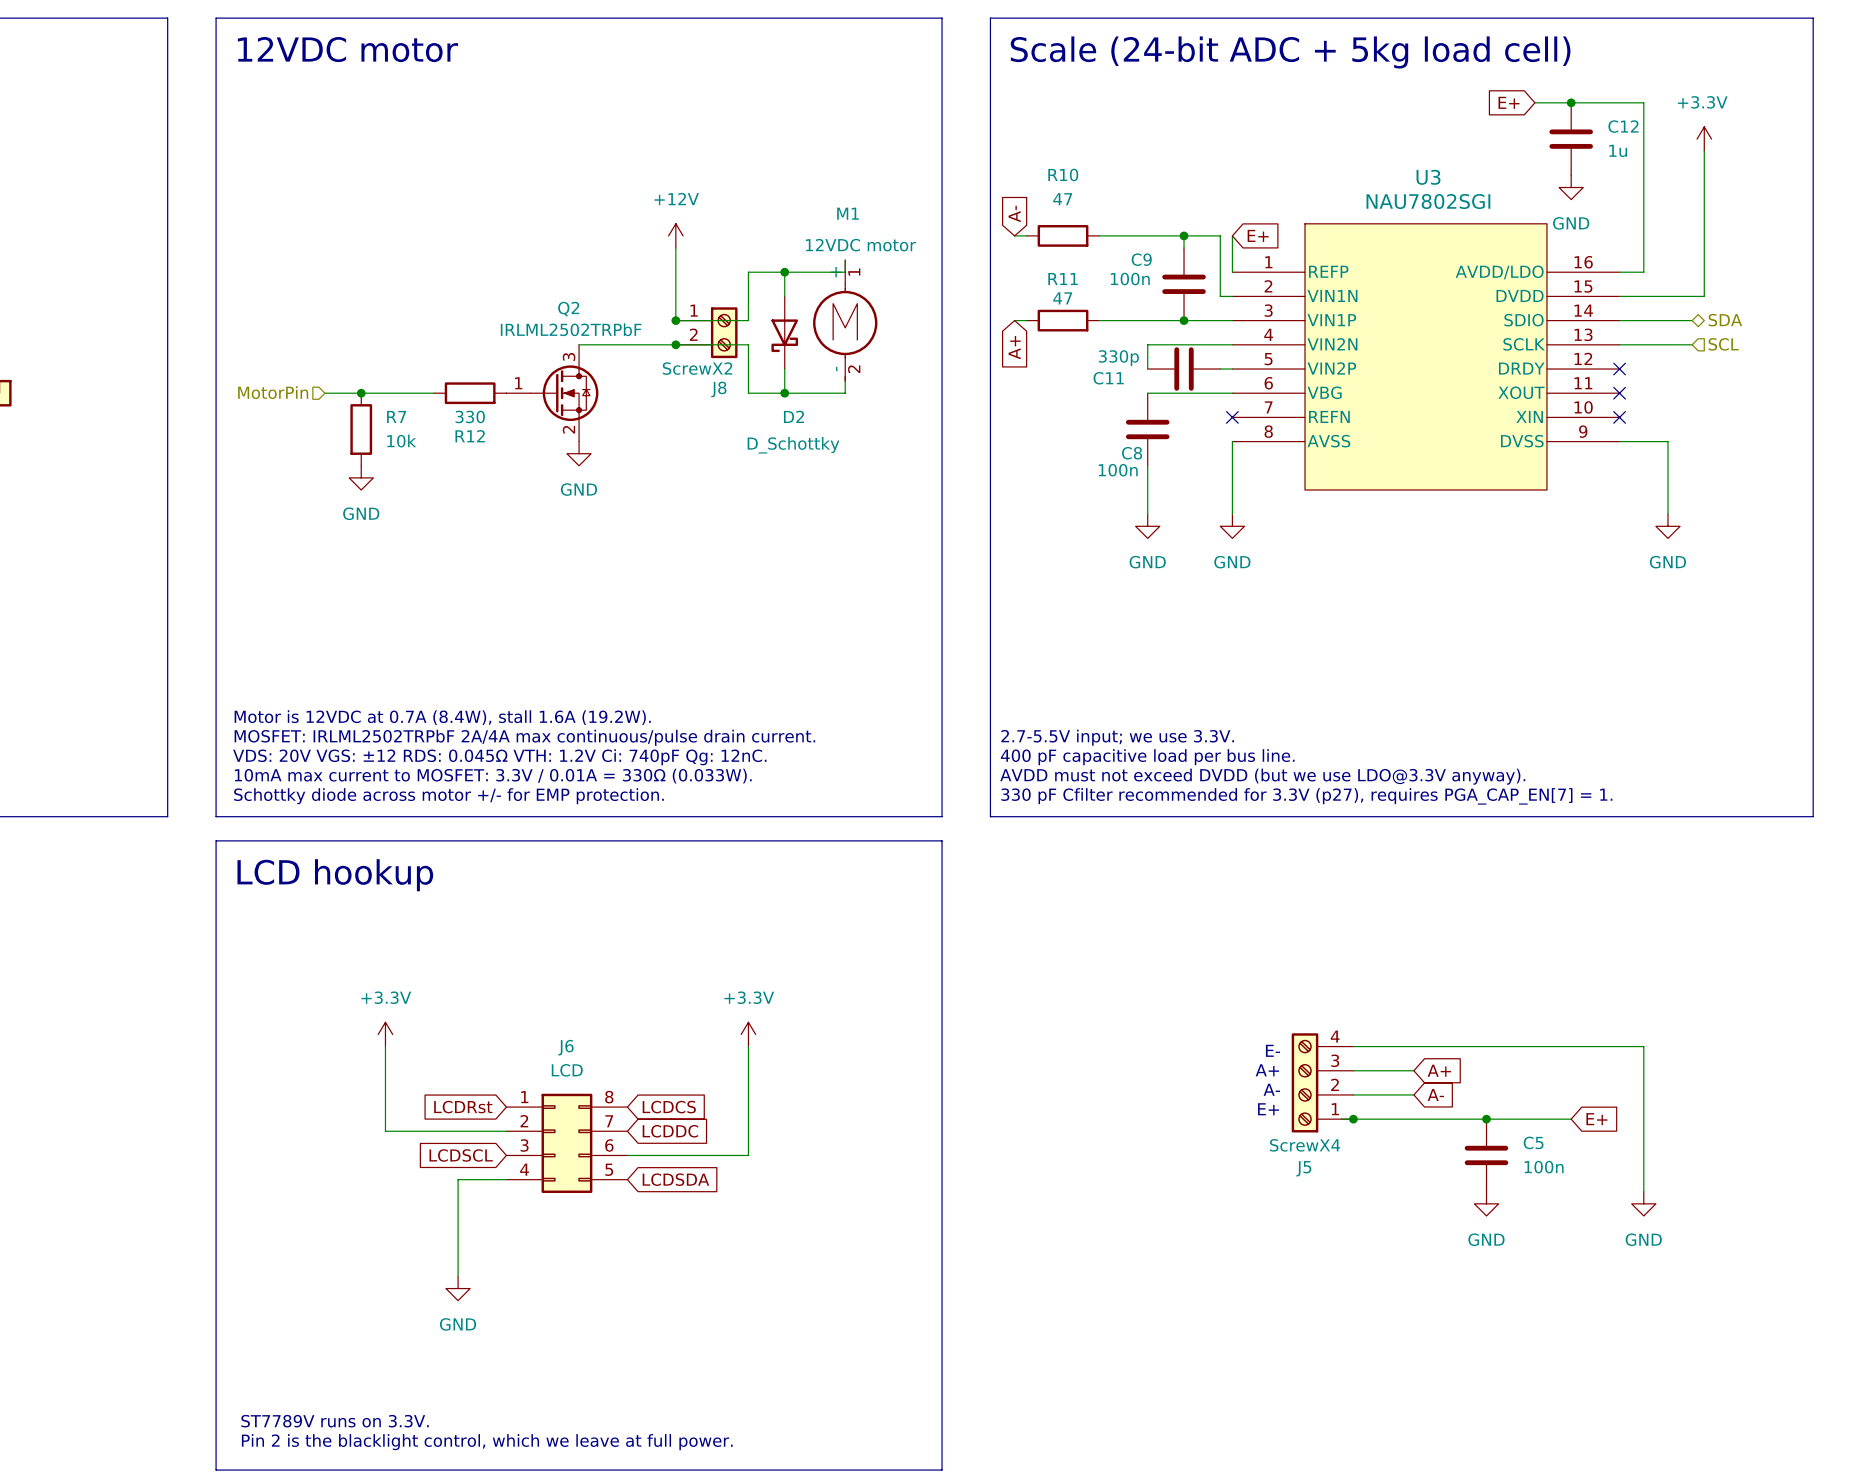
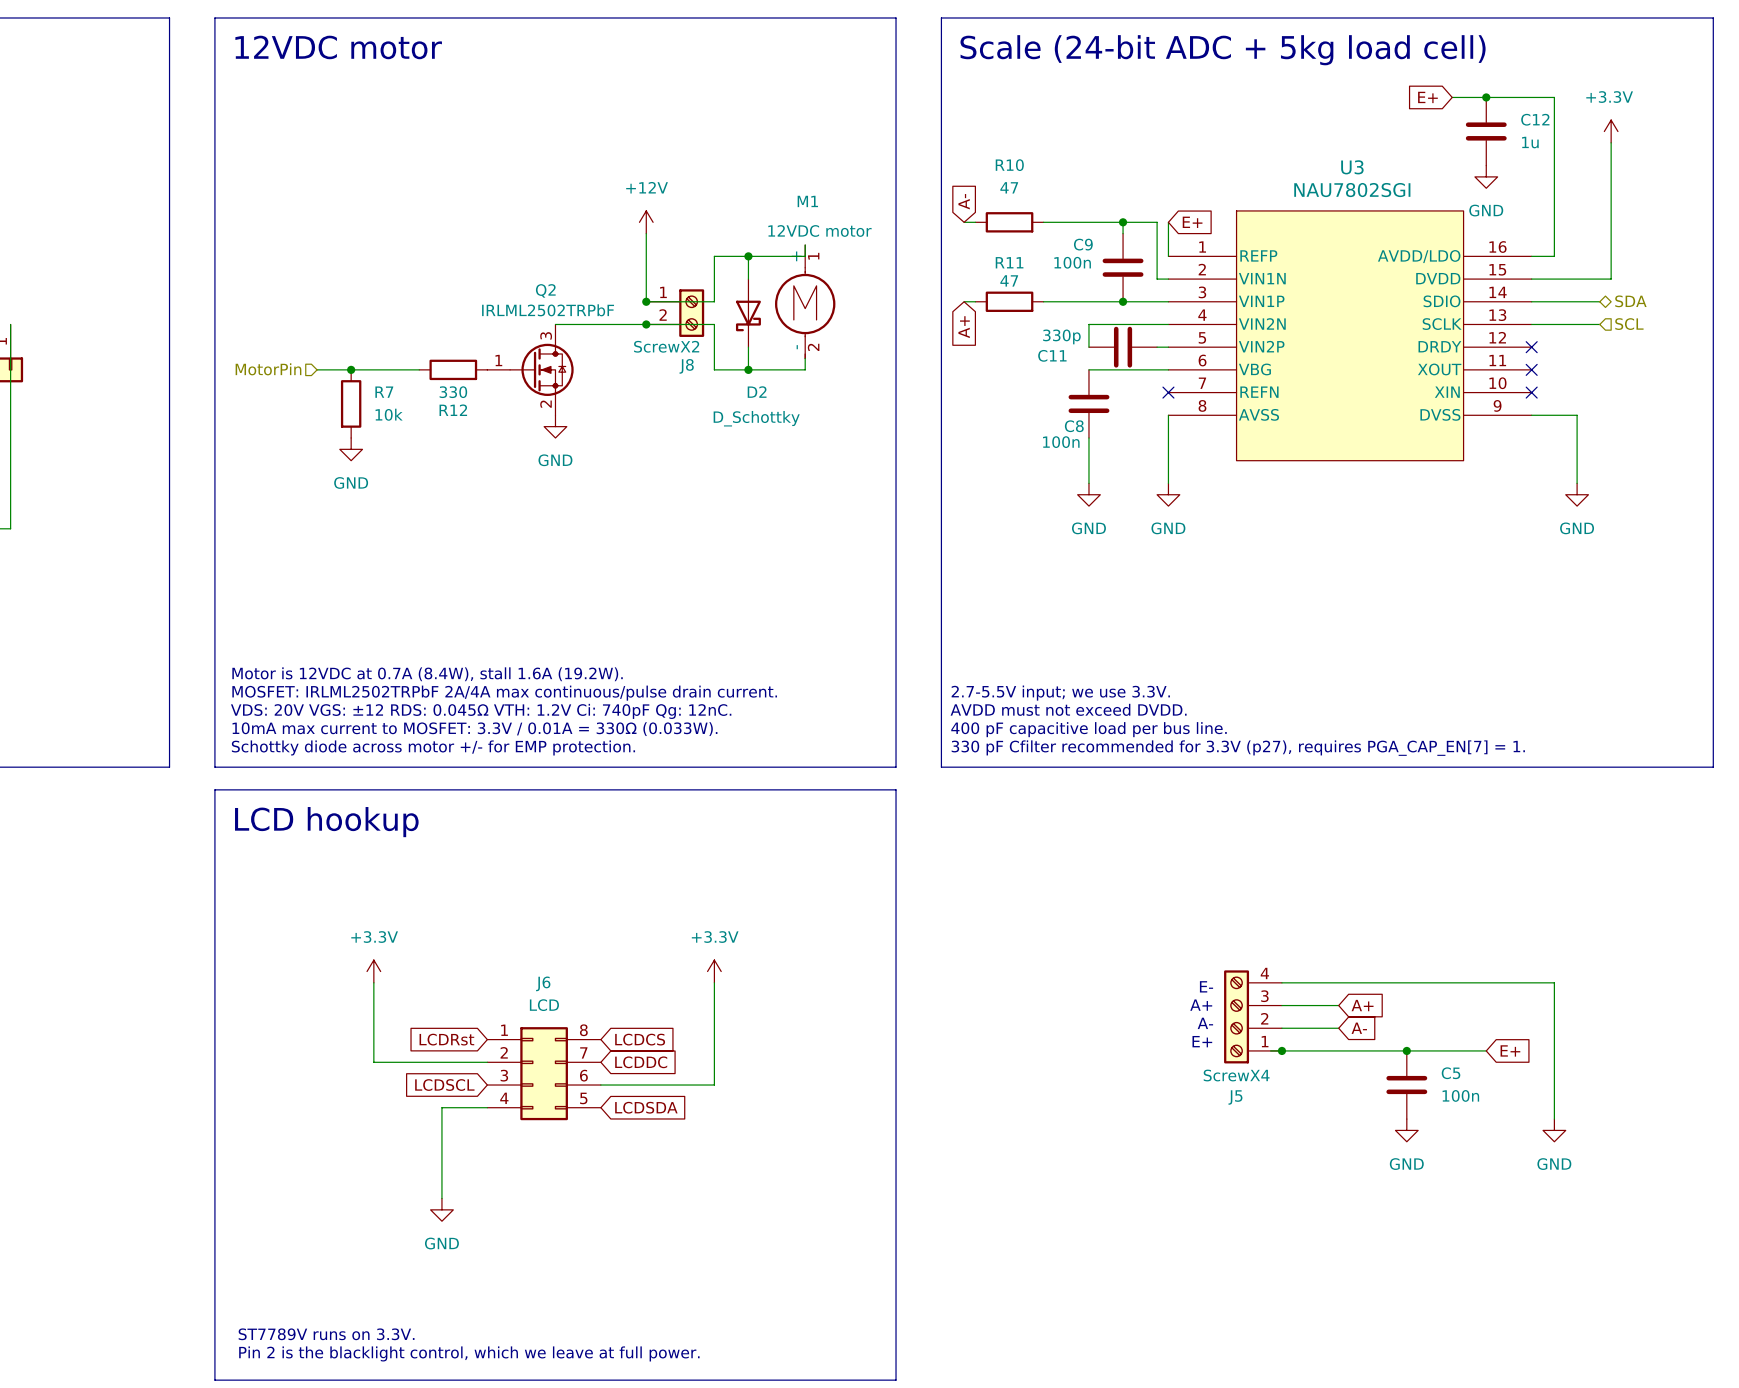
text: 400 pF capacitive load per bus line. (1147, 757) -> AVDD must not exceed DVDD. (1068, 709)
text: AVDD must not exceed DVDD (but we use LDO@3.3V anyway). (1262, 776) -> 400 pF capacitive load per bus line. (1089, 729)

